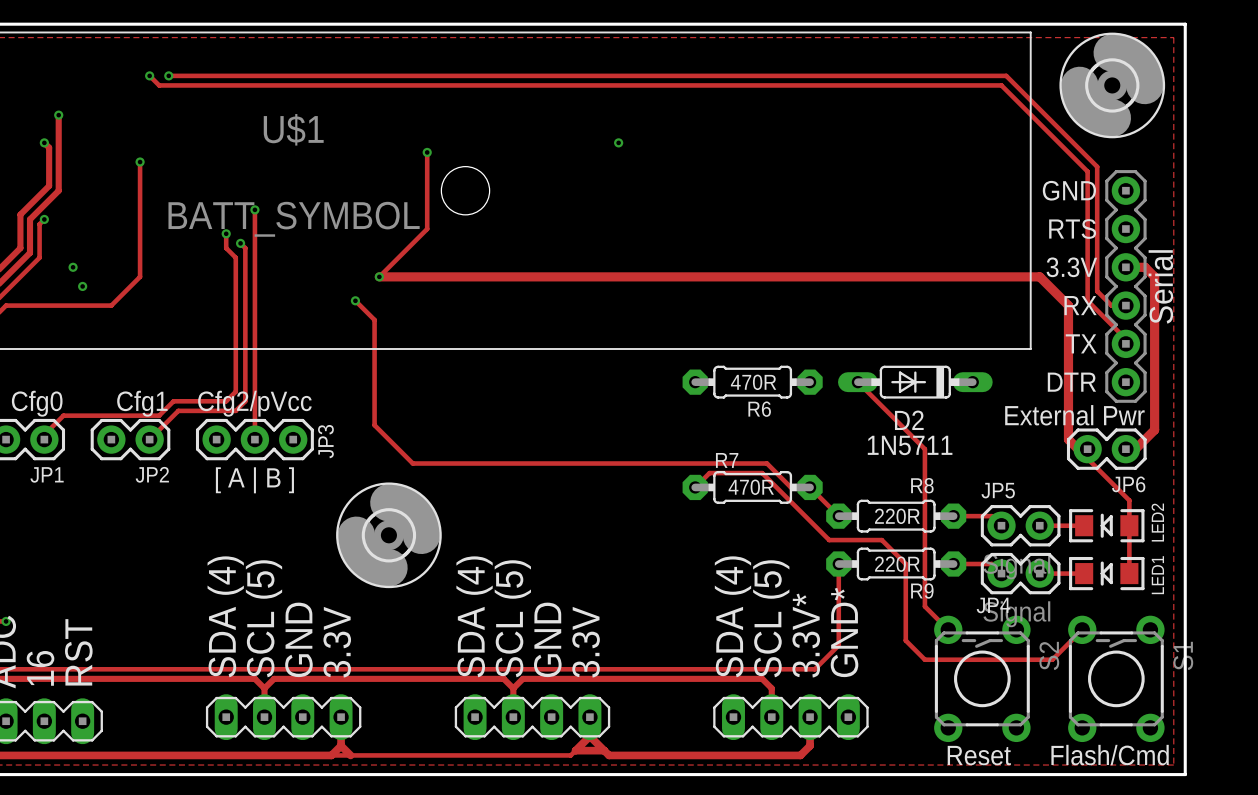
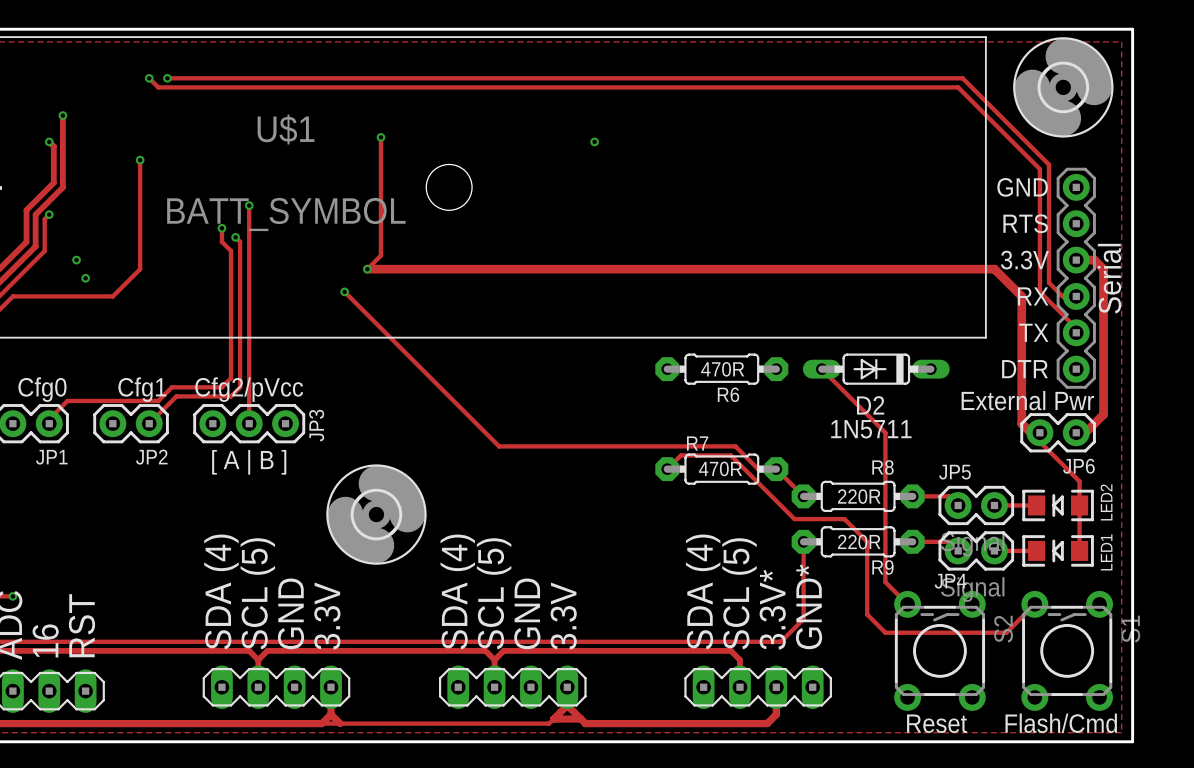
track: (427, 152) (427, 229) (393, 262) -> (381, 137) (381, 255)
via position: (427, 152) -> (381, 137)
track: (374, 319) (374, 425) (412, 463) (518, 463) -> (362, 310) (499, 446)

